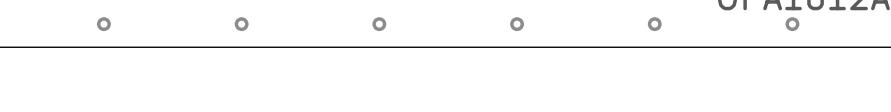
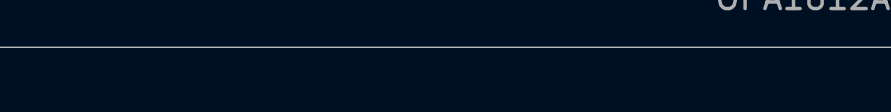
via: (103, 24) -> none
via: (241, 24) -> none
via: (379, 24) -> none
via: (517, 24) -> none
via: (654, 24) -> none
via: (792, 24) -> none

